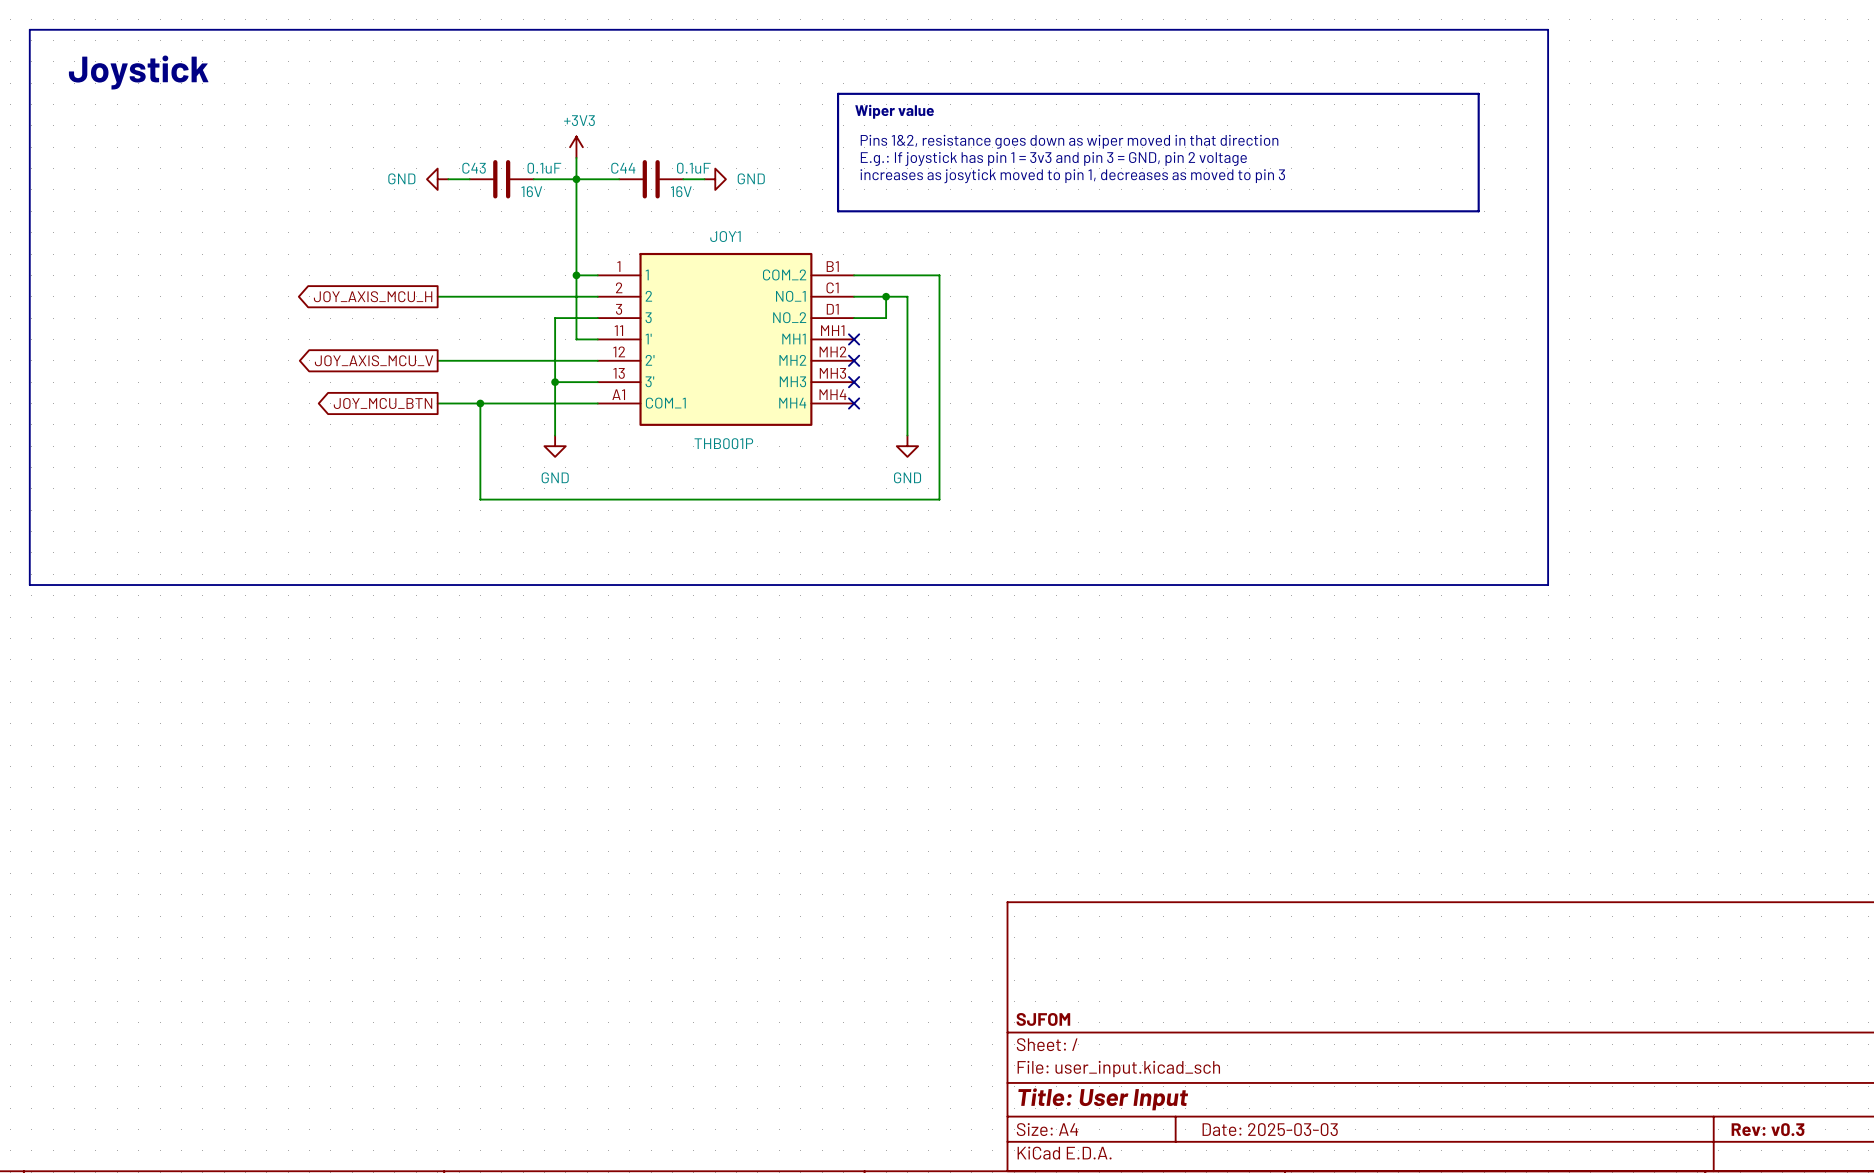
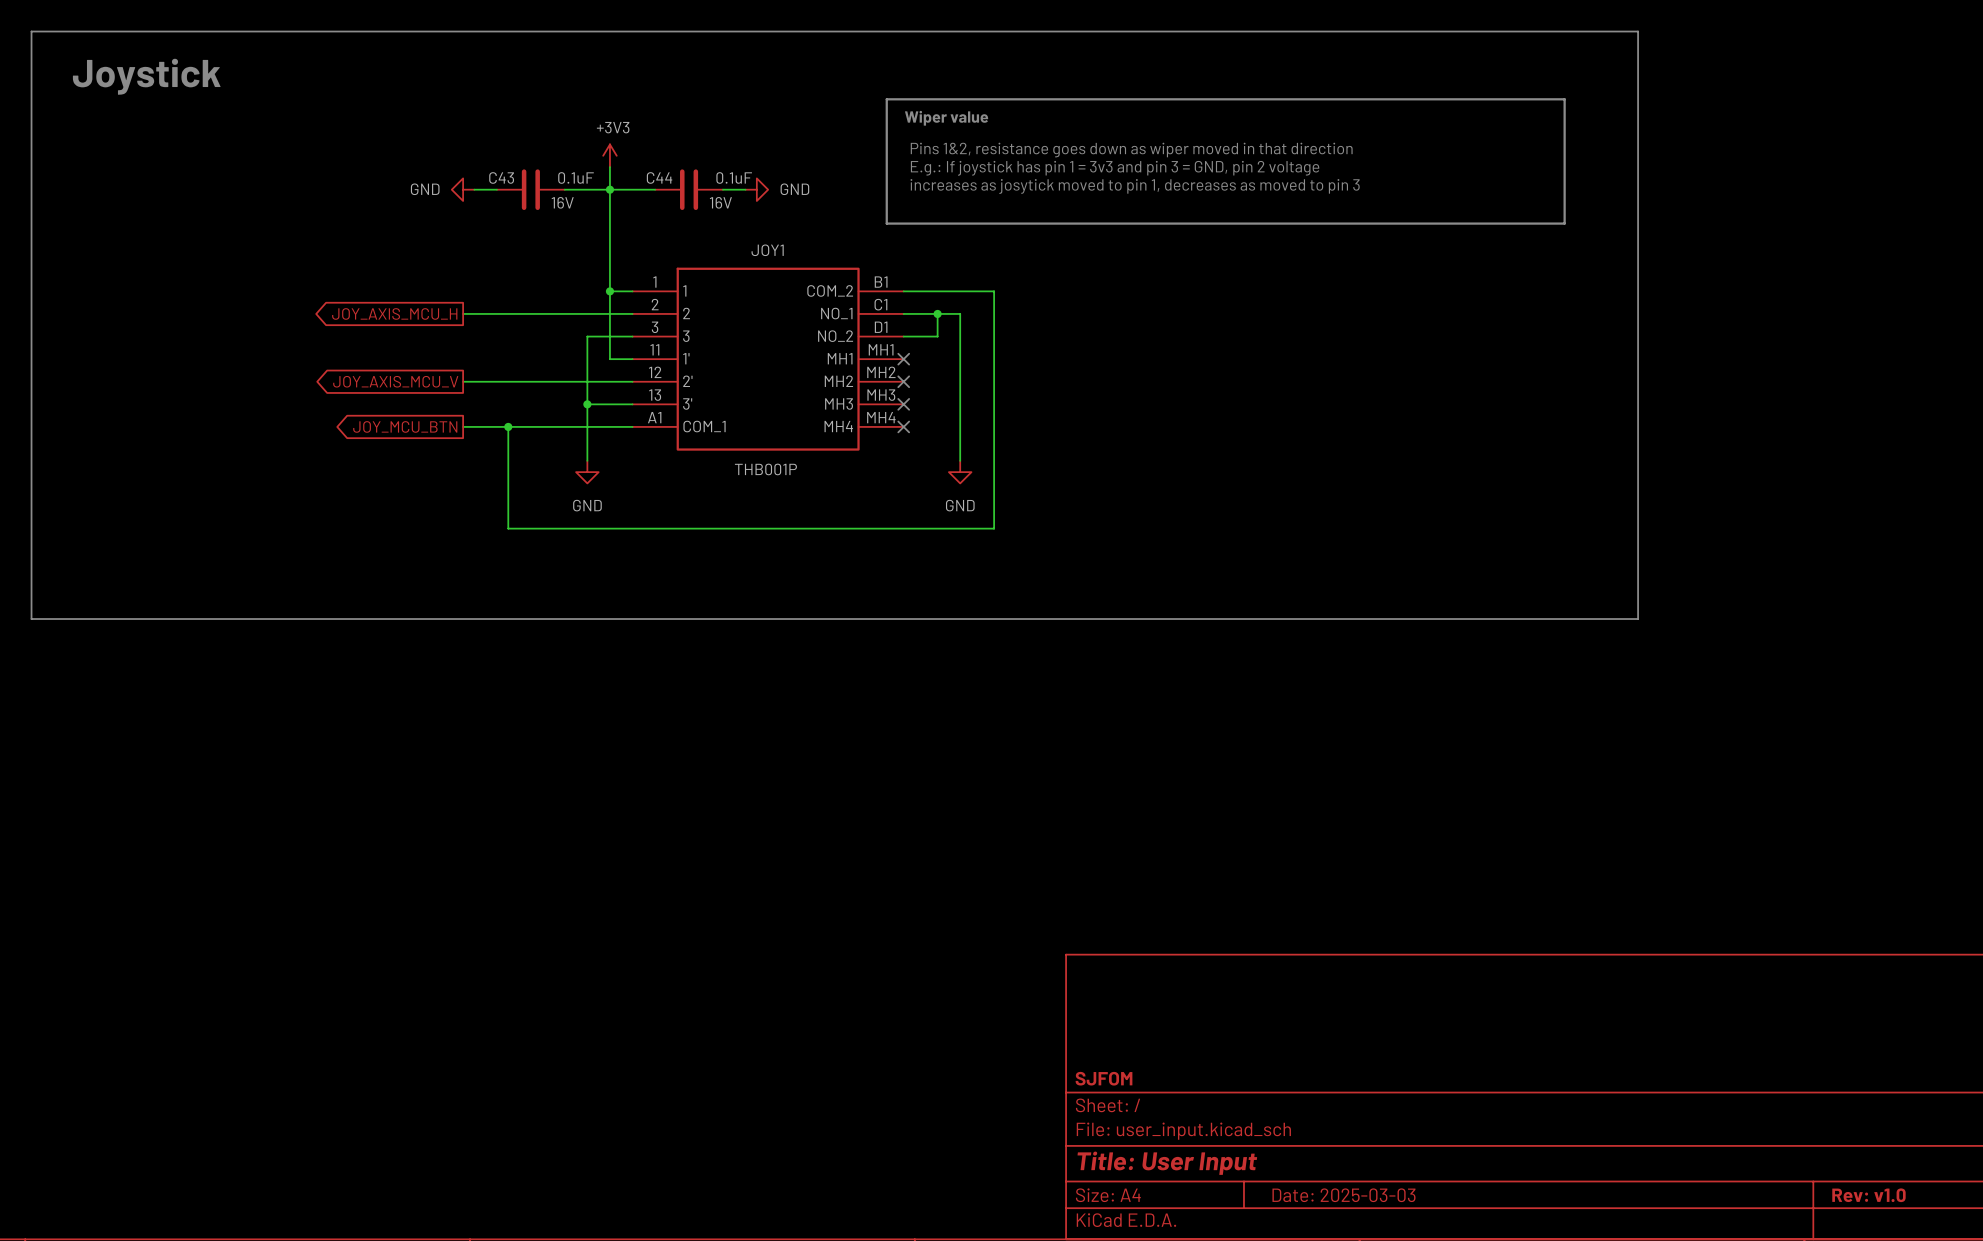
title block: Rev: v0.3 (1768, 1129) -> Rev: v1.0 (1868, 1195)

